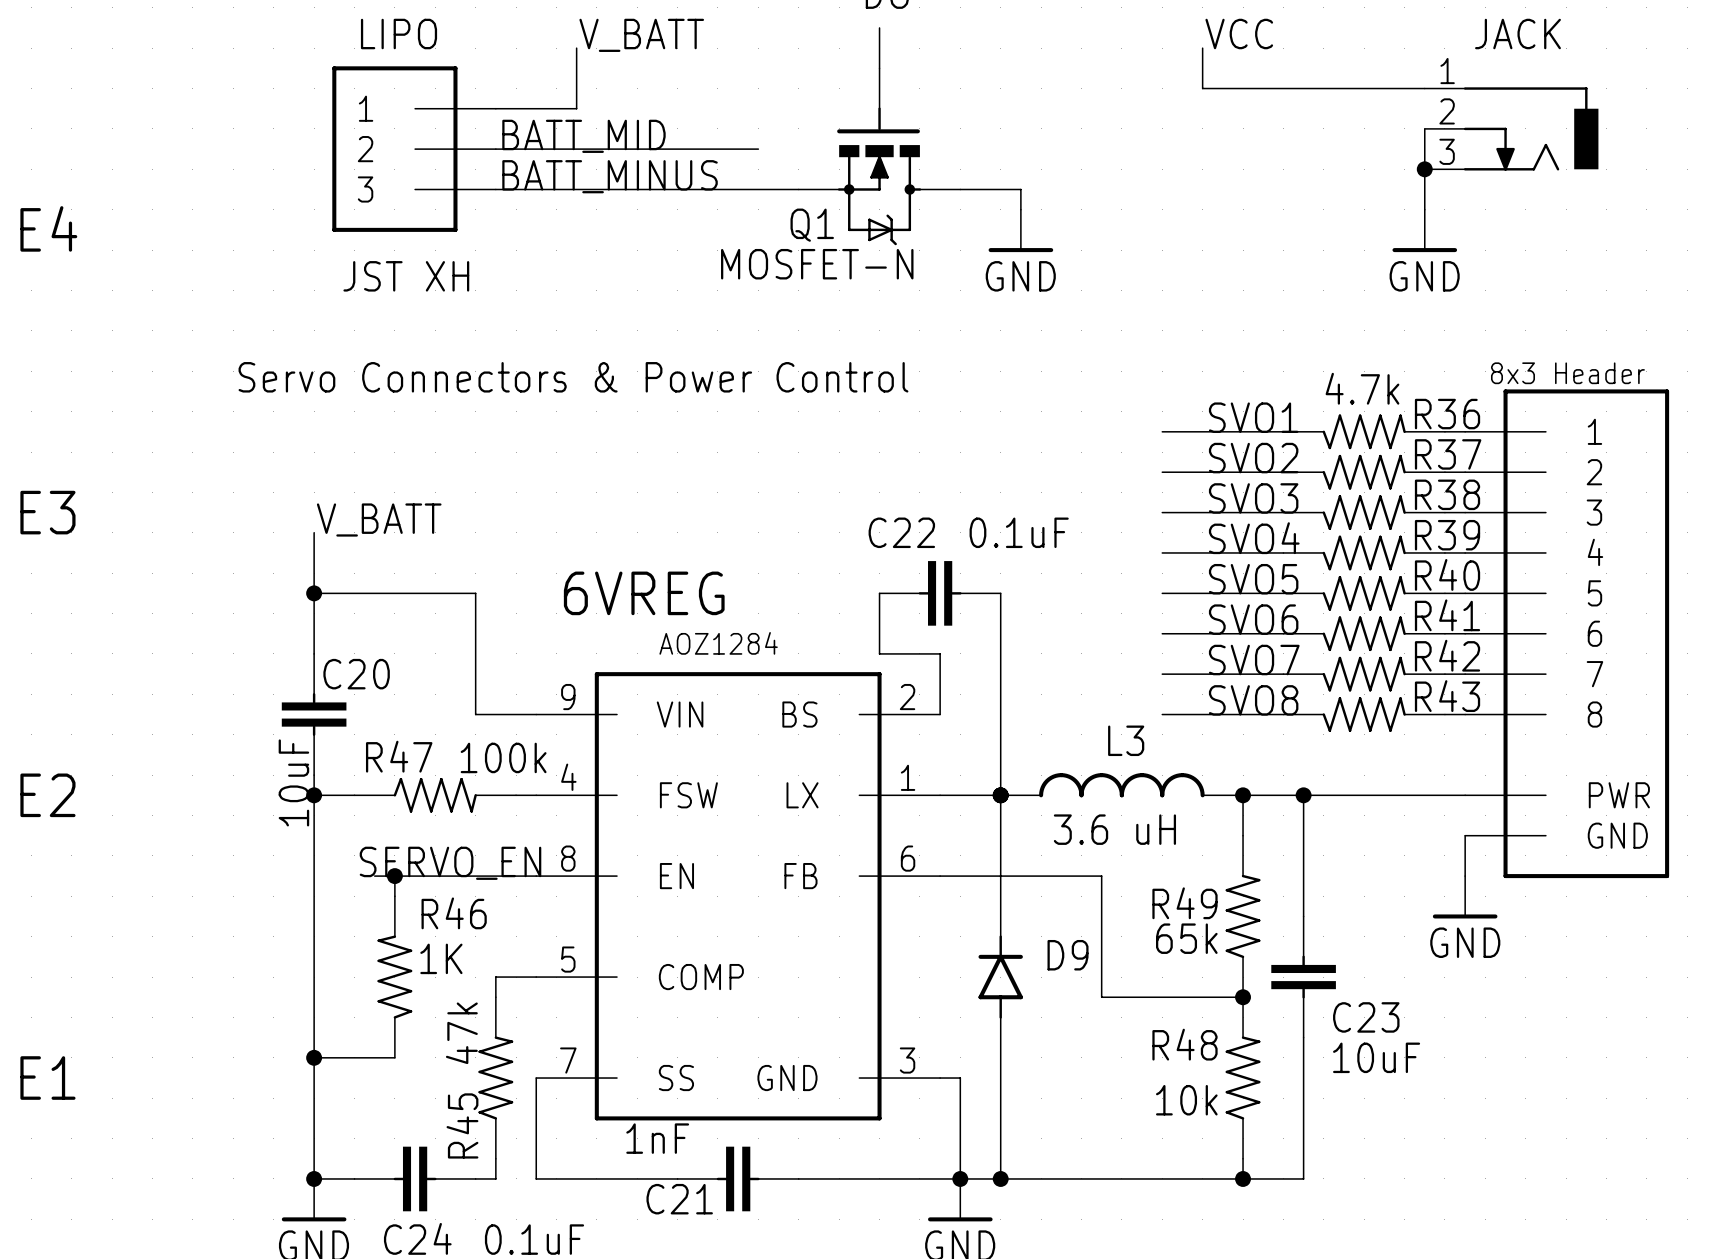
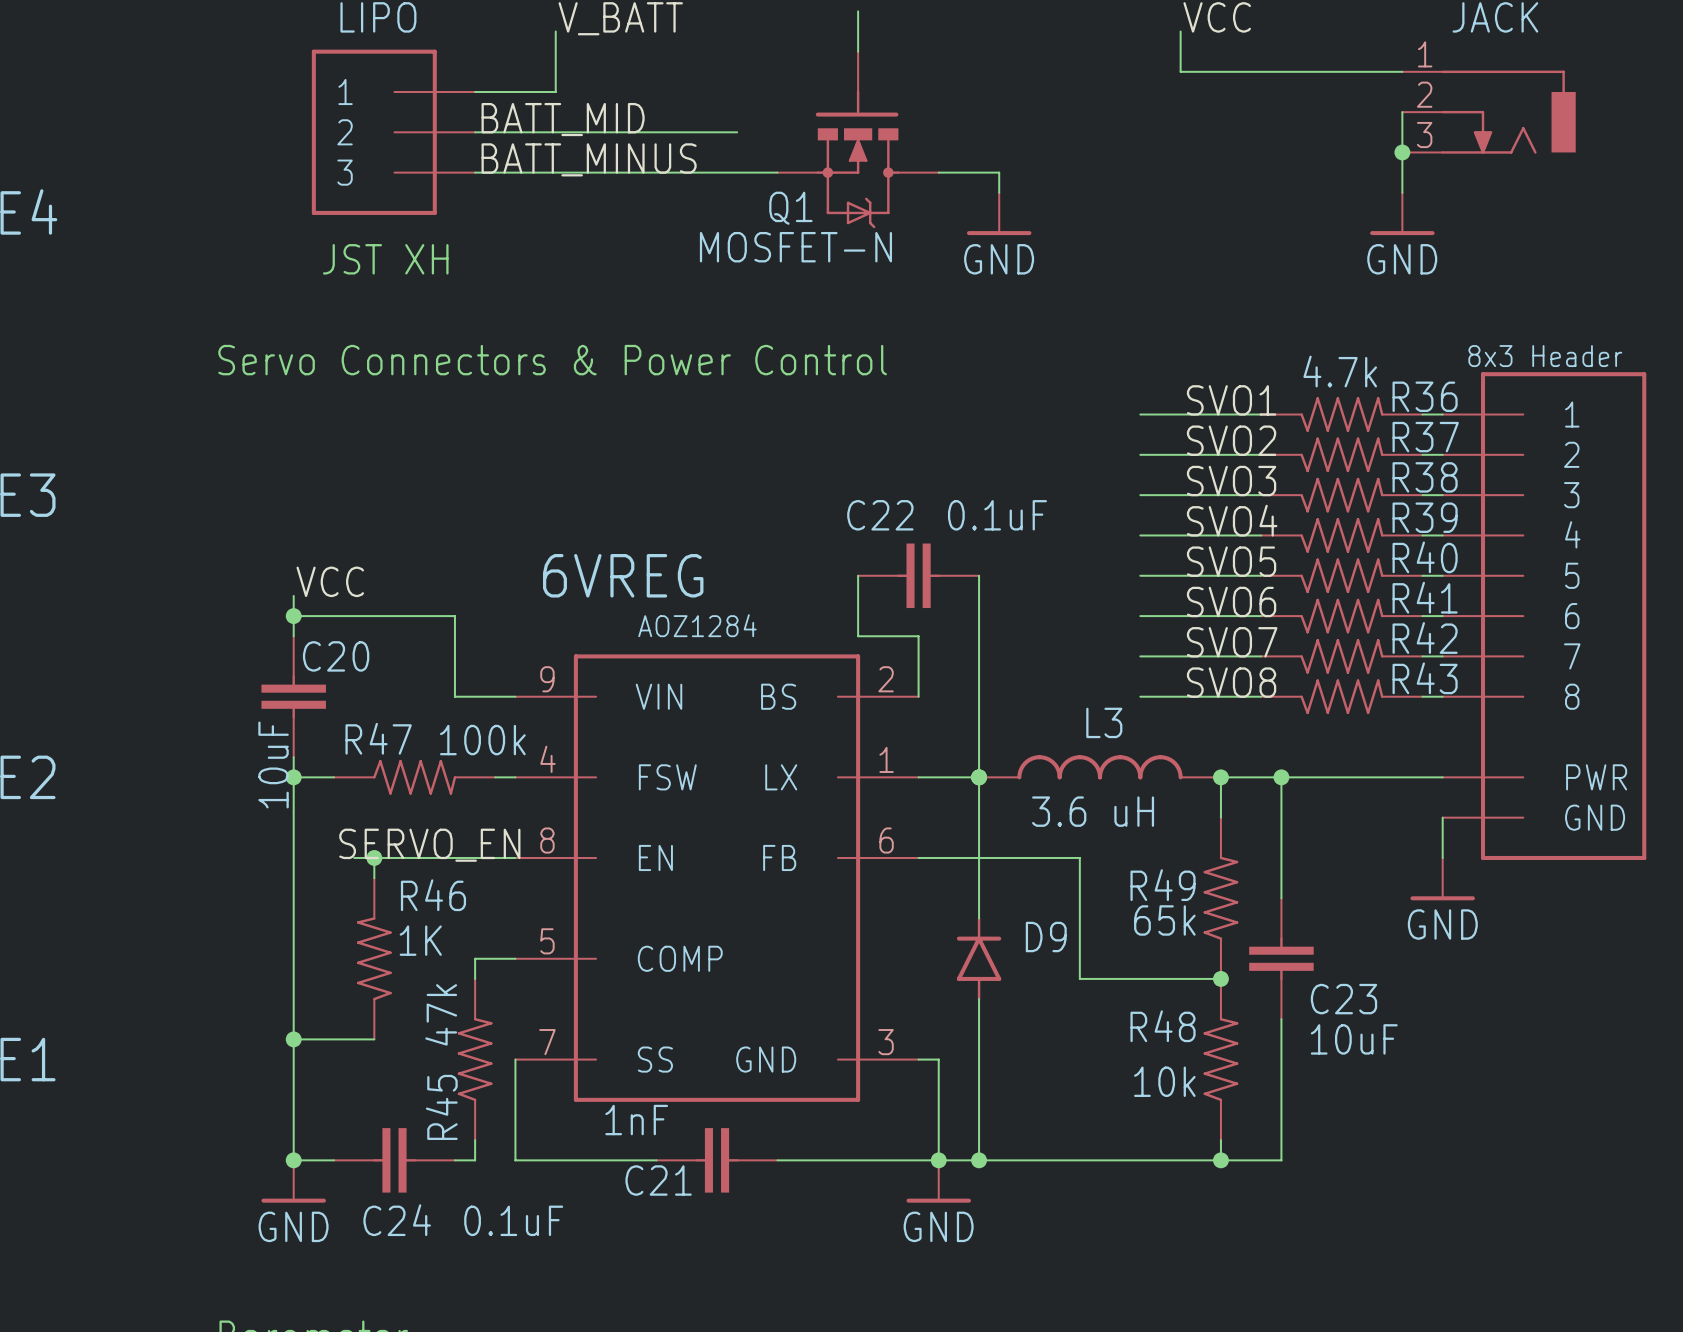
label: V_BATT (379, 520) -> none
wire: (314, 532) (314, 613) -> none
wire: (314, 593) (475, 593) (475, 633) -> (293, 616) (454, 616)
junction position: (314, 593) -> (293, 616)
label: none -> VCC (330, 581)

